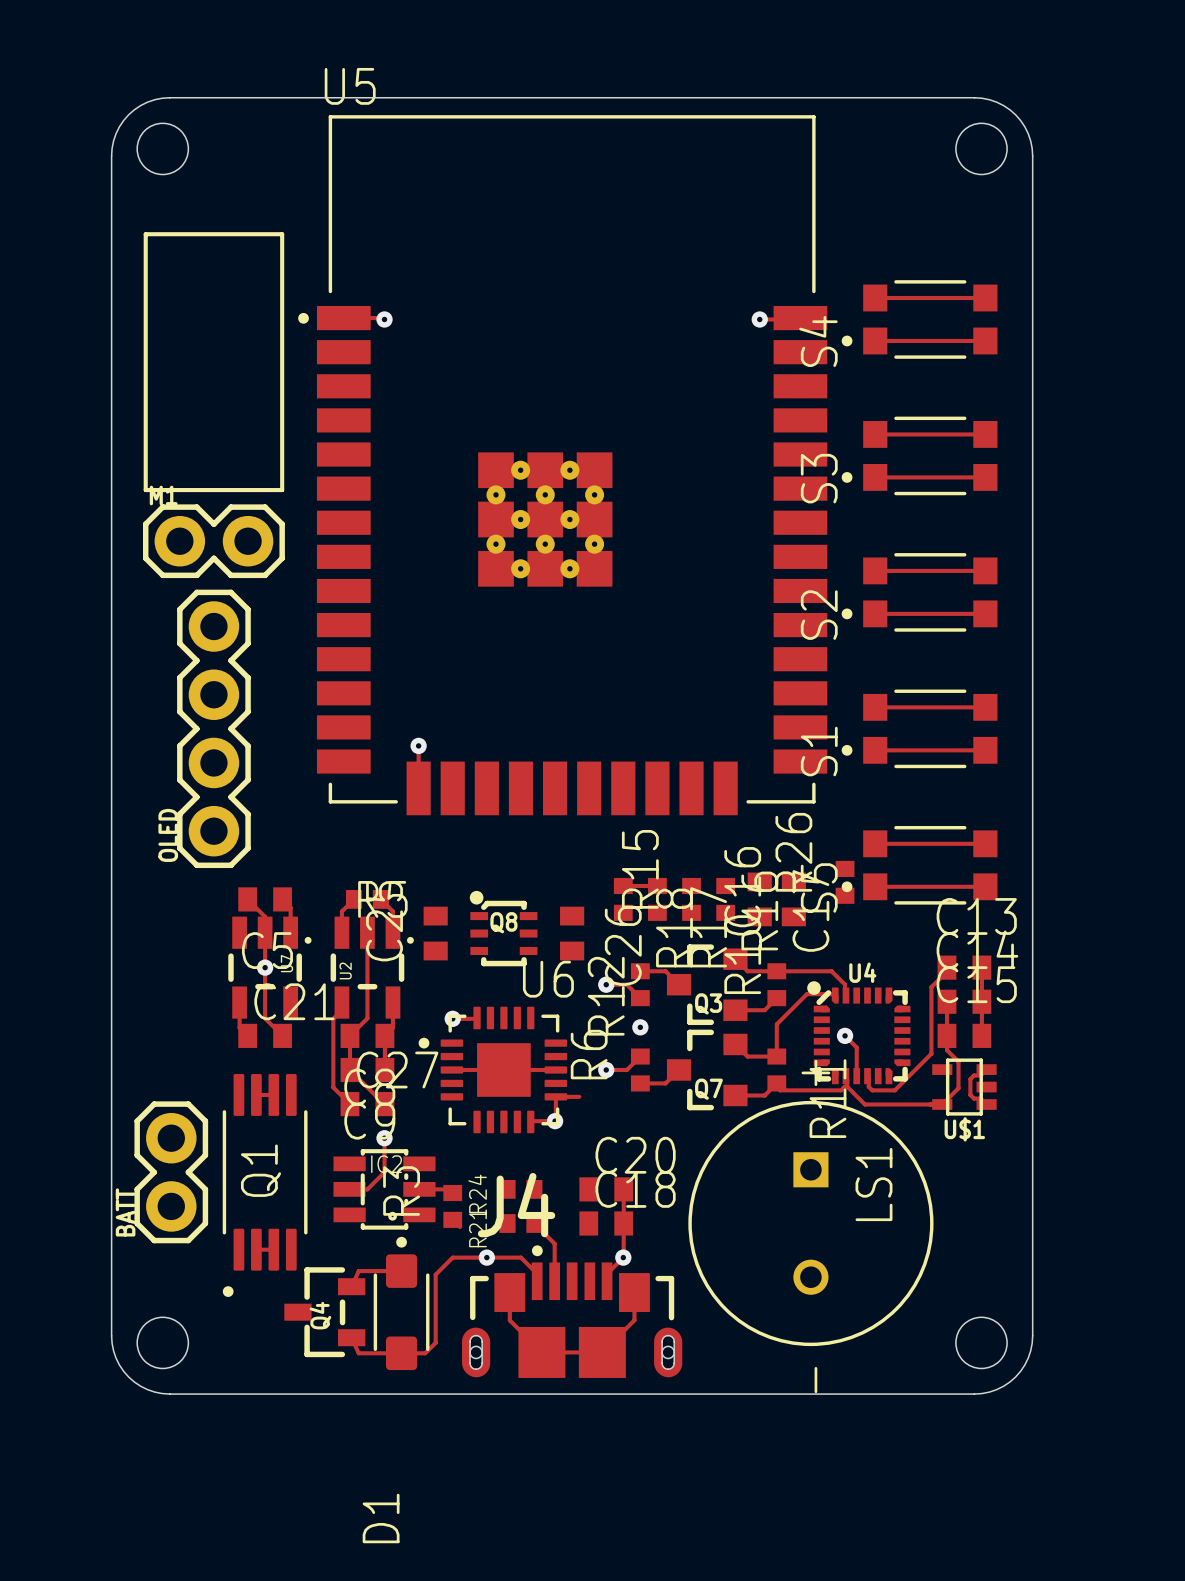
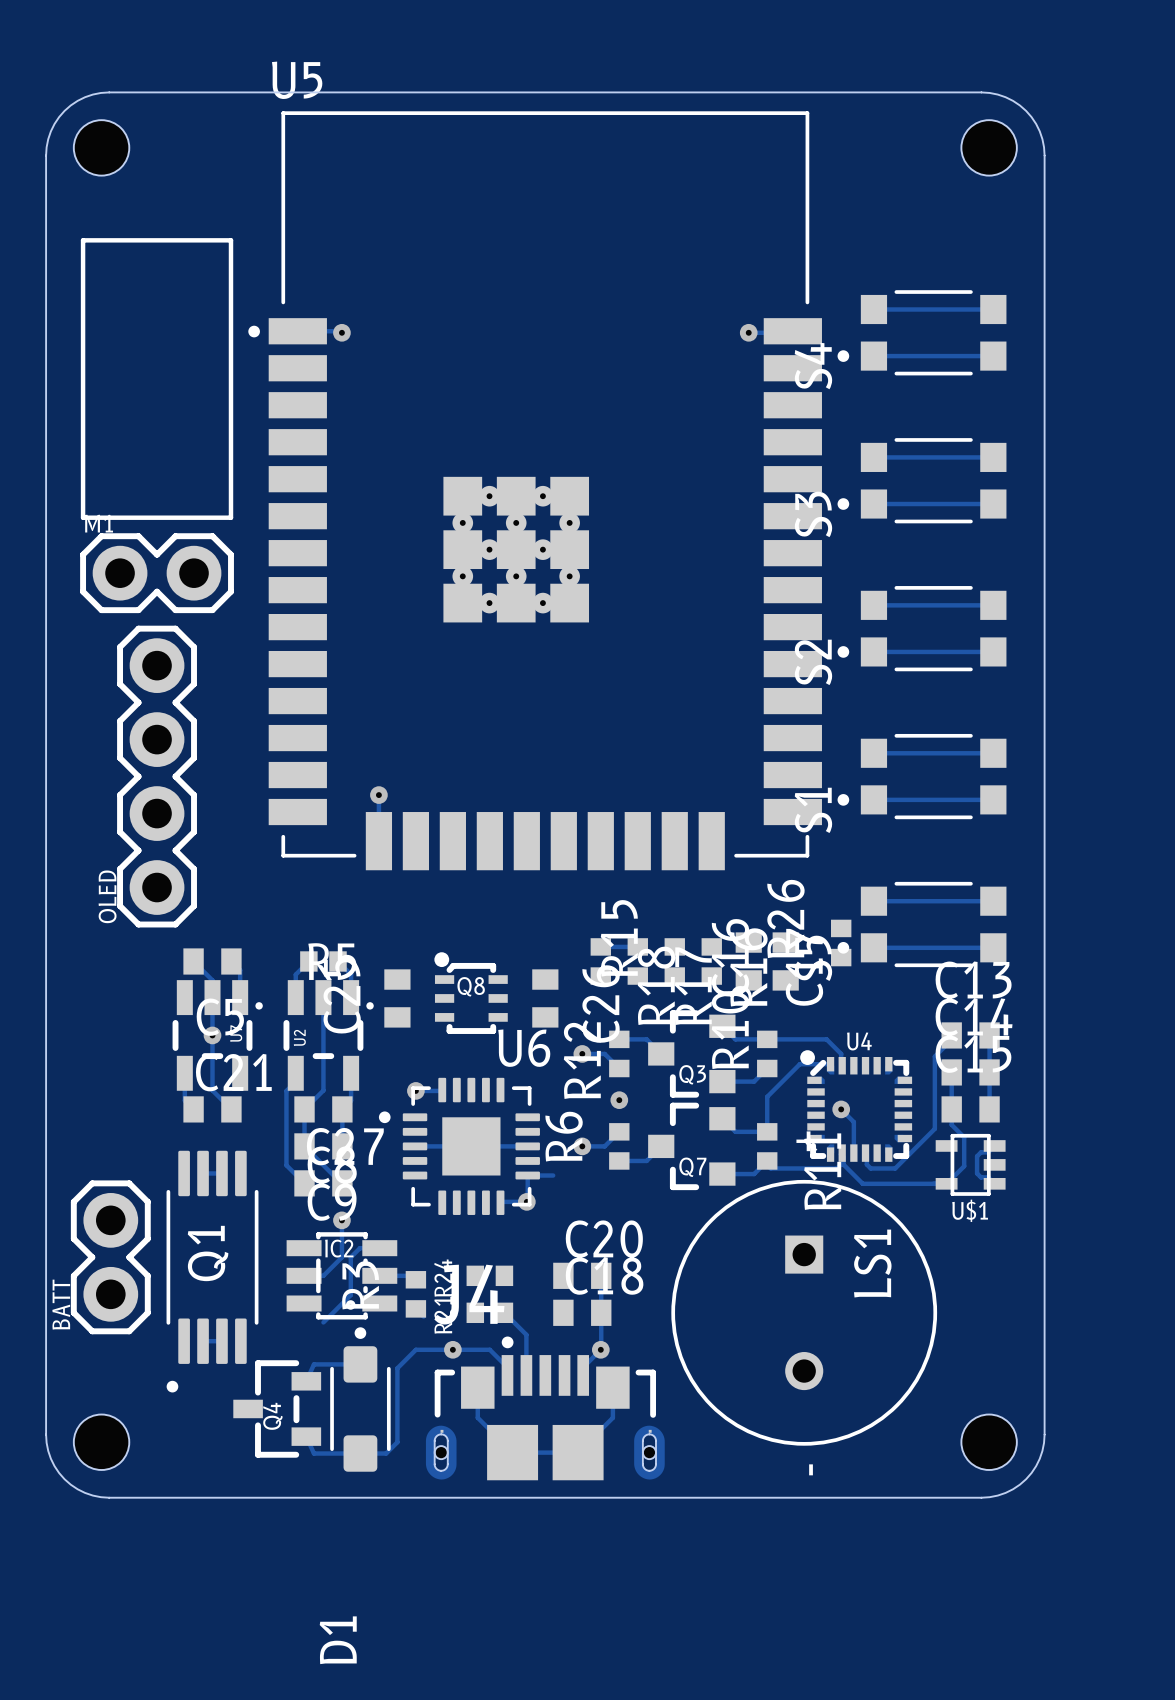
track: none -> (379, 1248) (359, 1248) (350, 1257) (350, 1295) (323, 1322)

